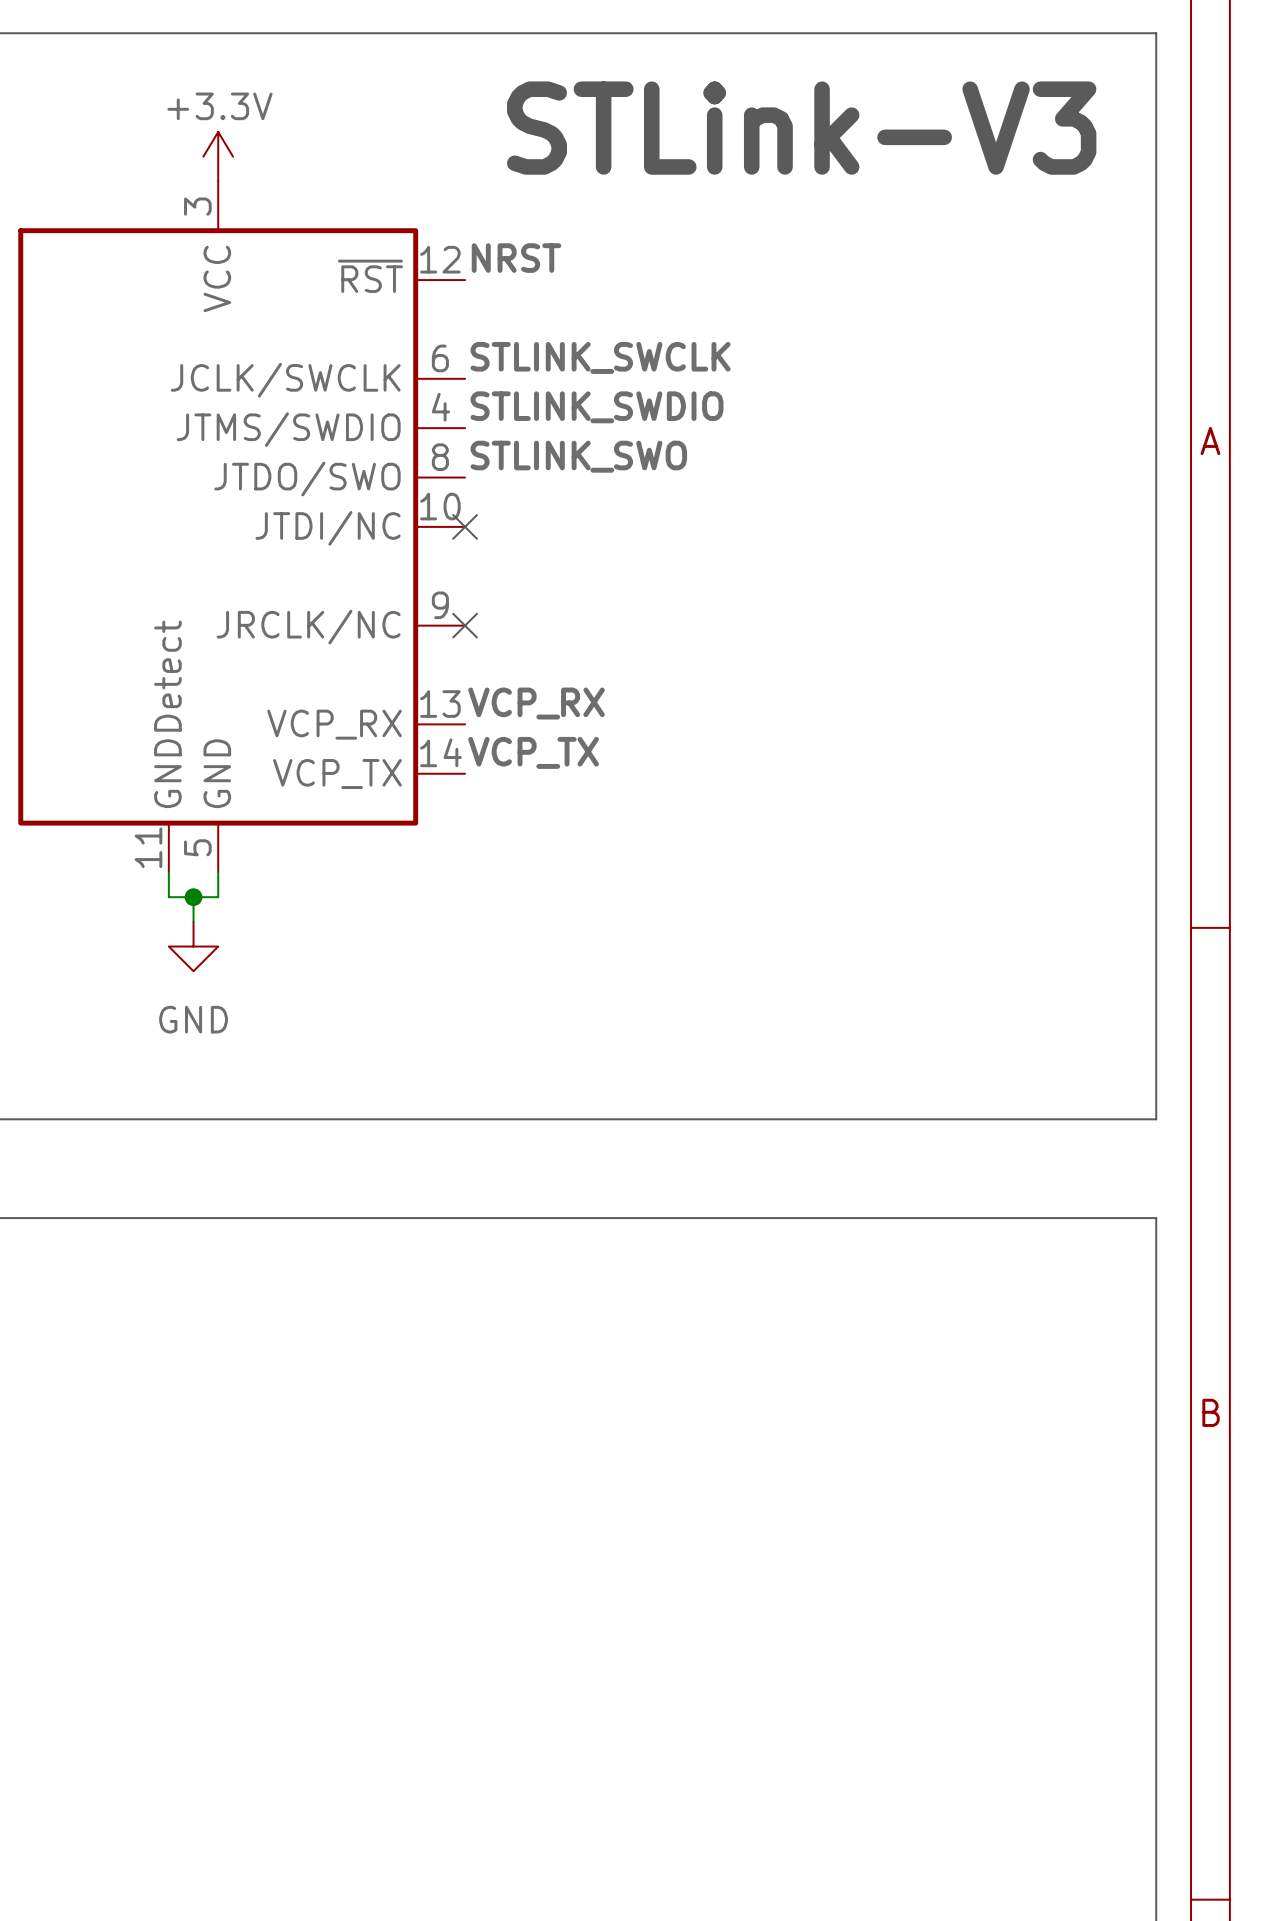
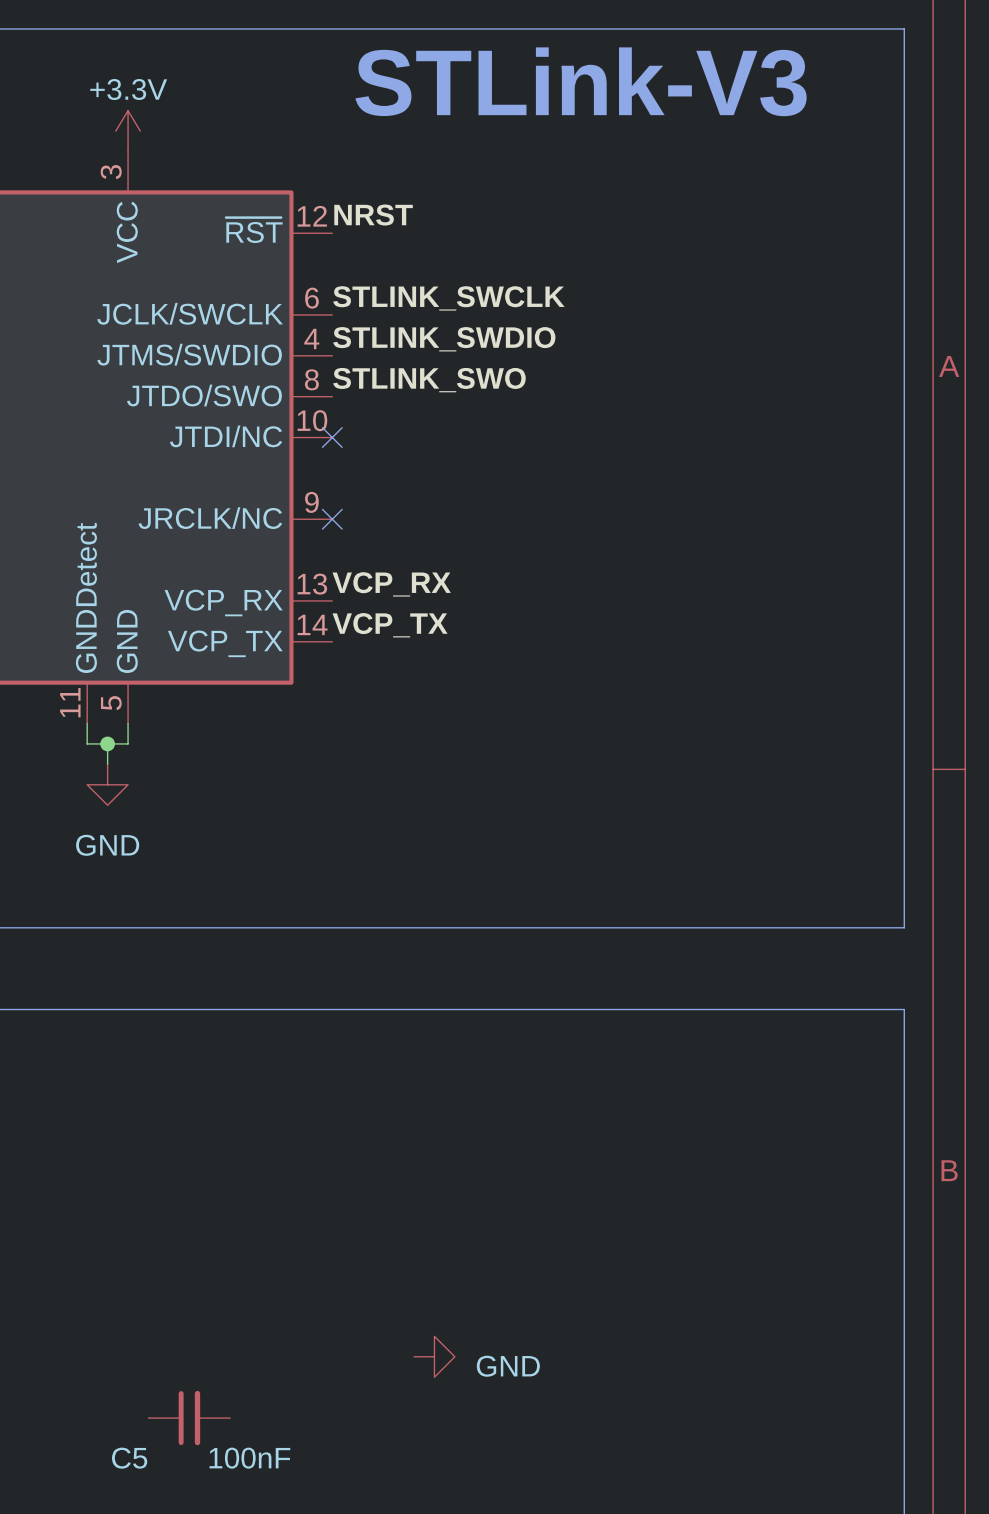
text position: STLink-V3 (801, 128) -> STLink-V3 (581, 81)
power symbol: none -> GND (434, 1356)
C5: none -> 100nF (189, 1418)

